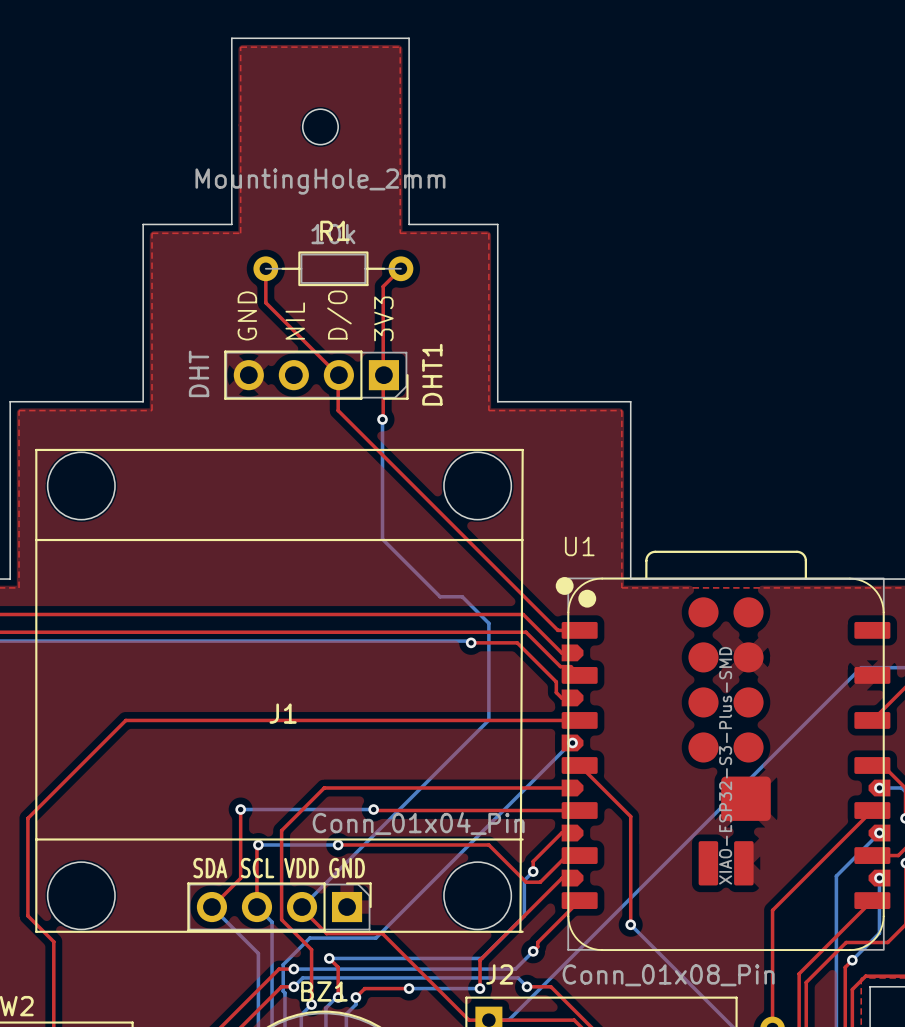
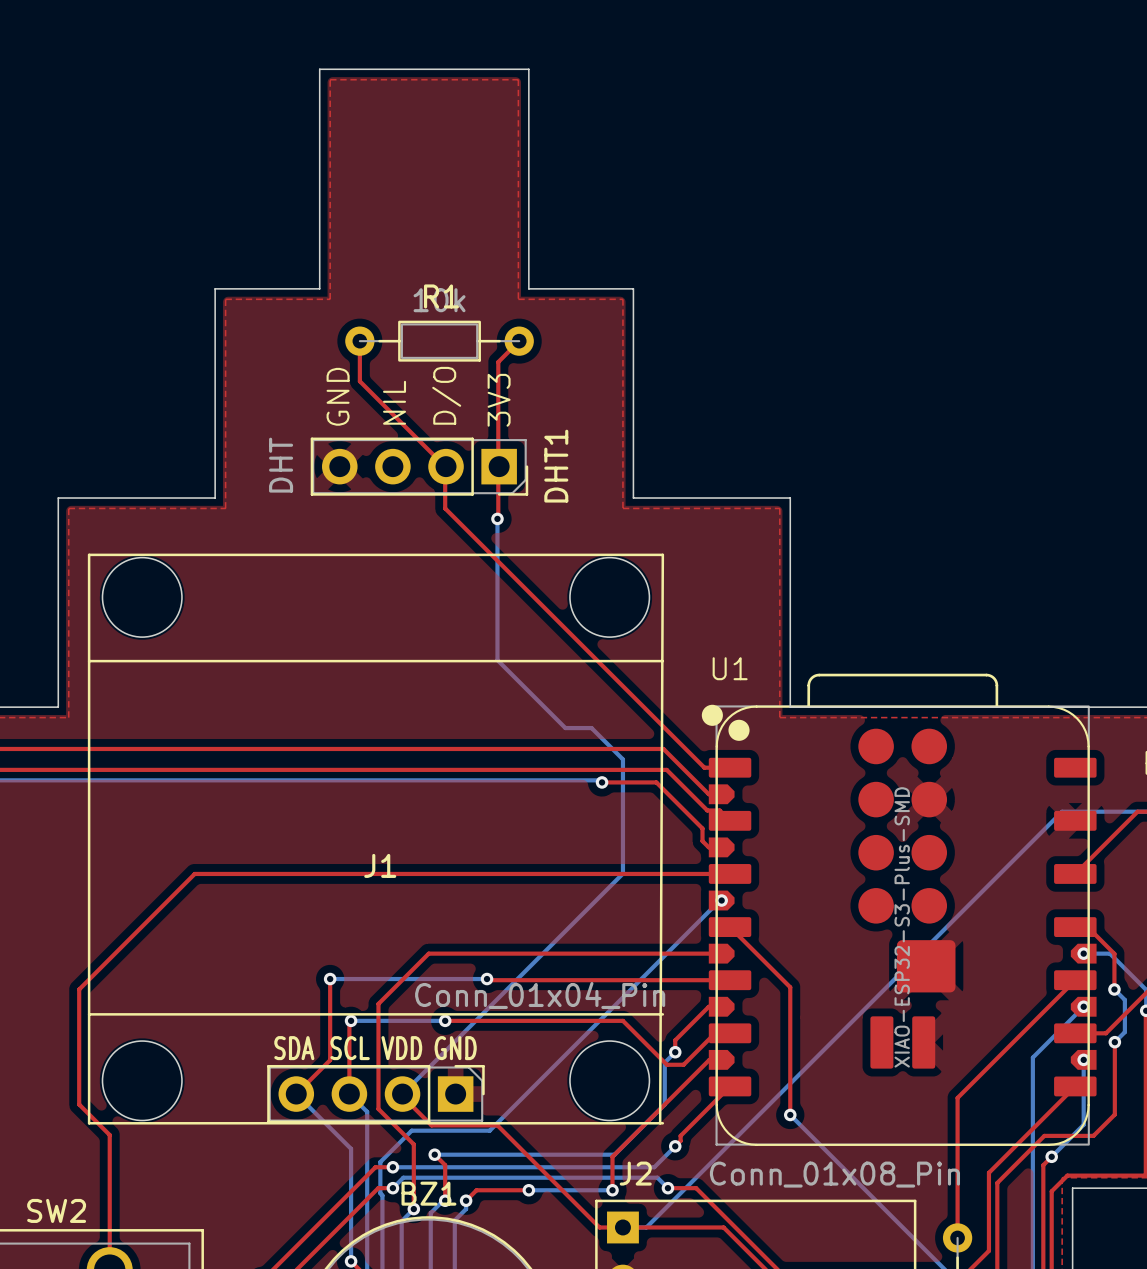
part: MountingHole_2mm (320, 126) -> none

